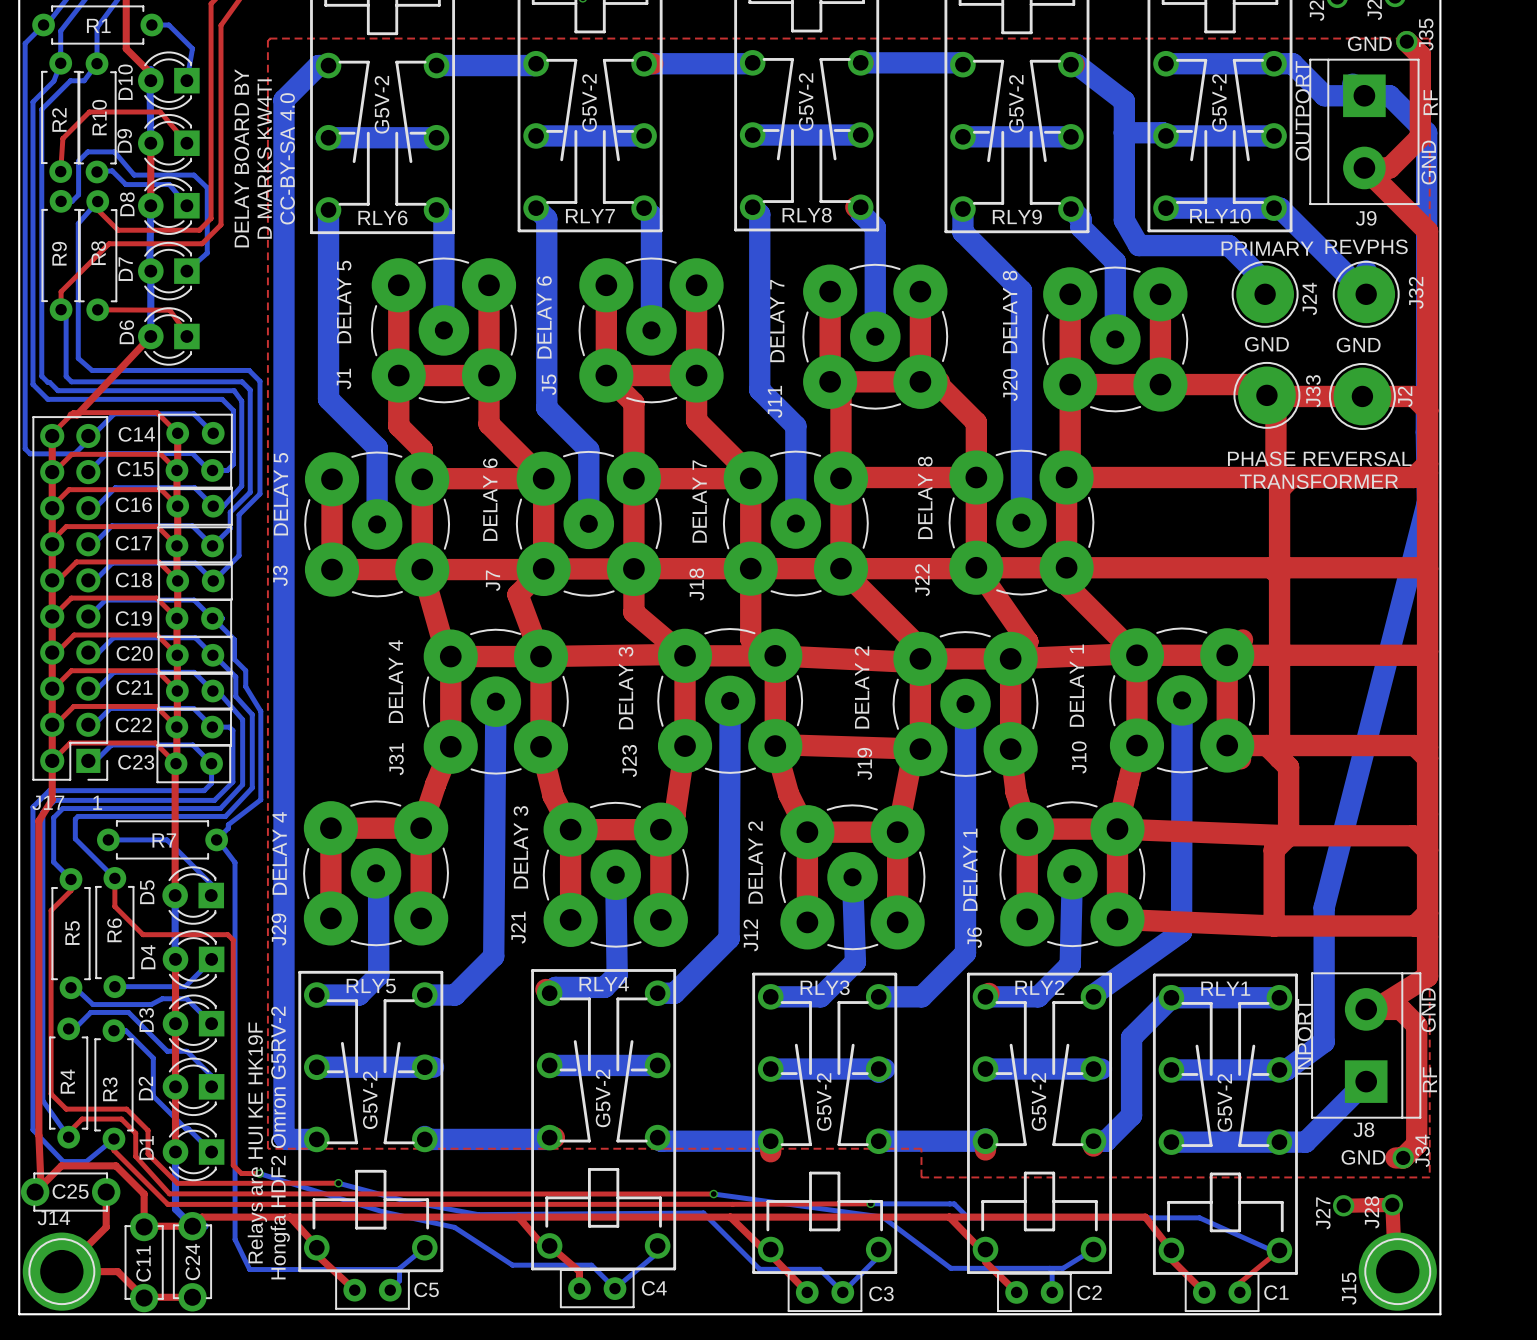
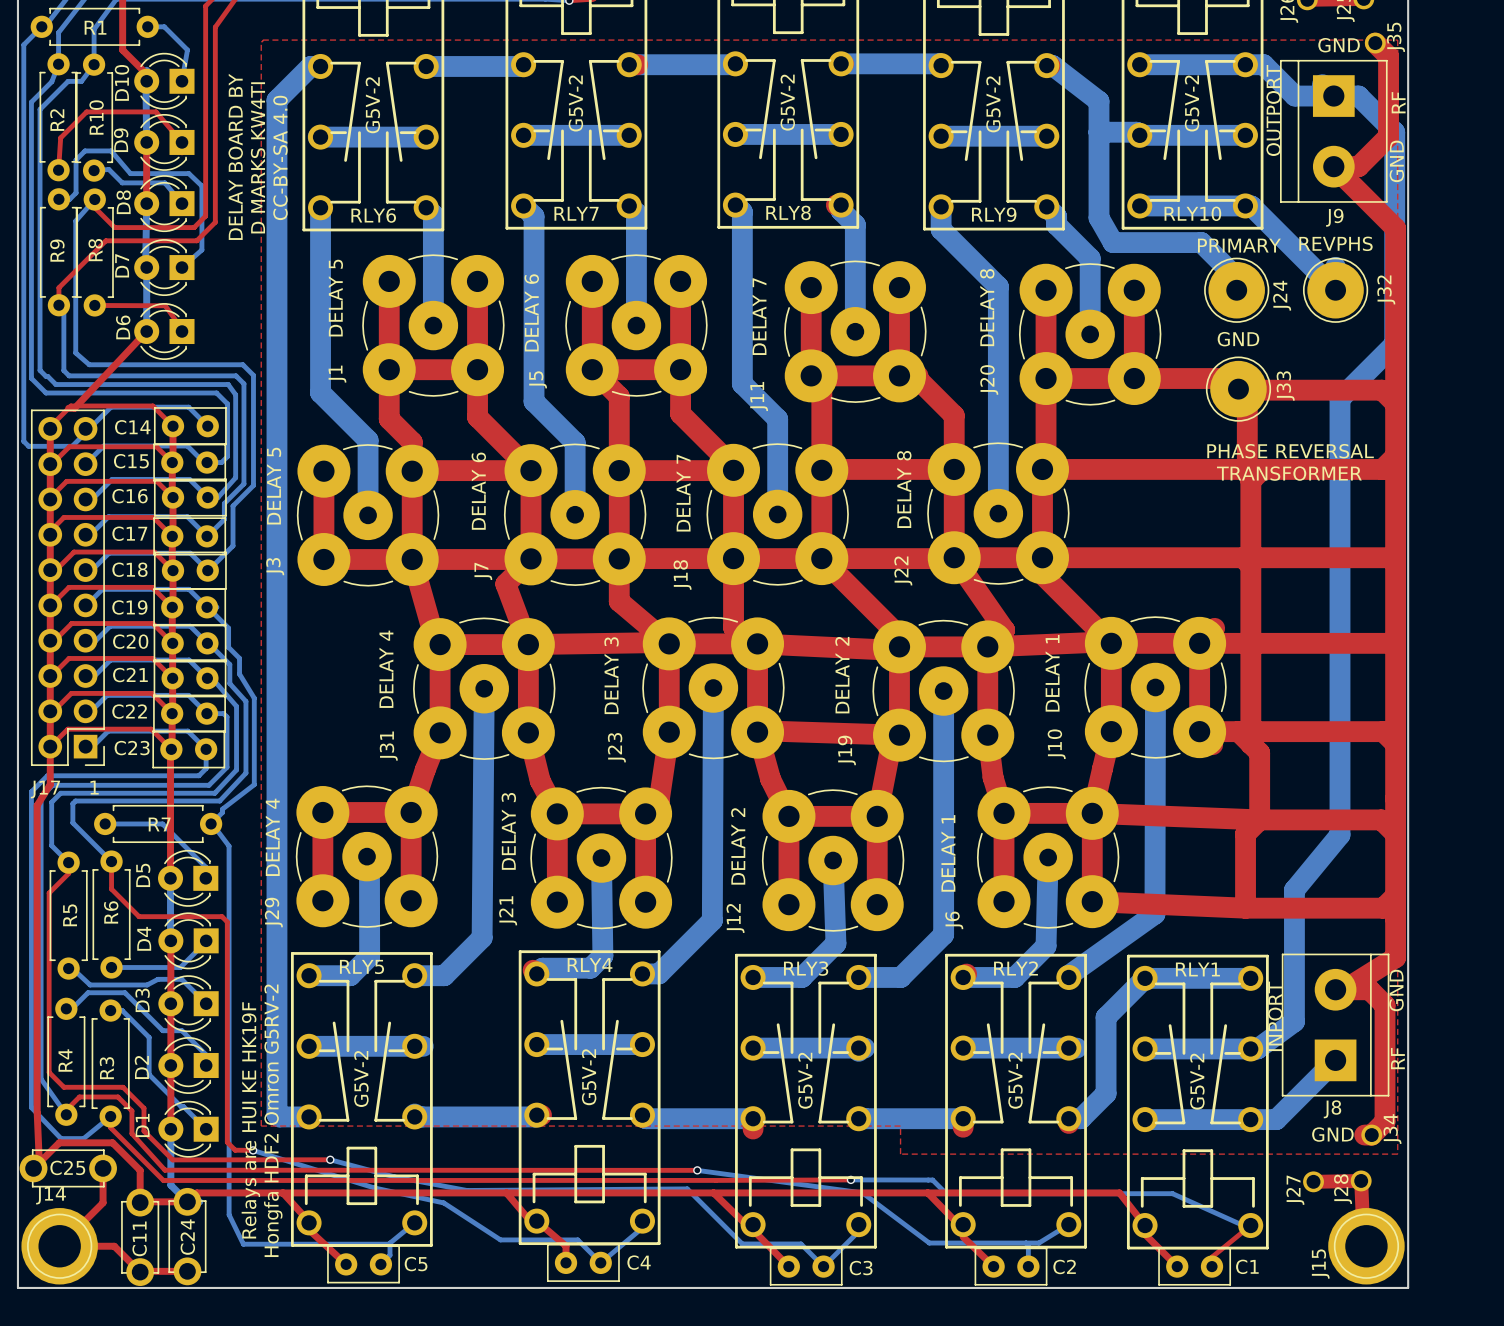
text: GND (1358, 345) -> none
bottom track: (1426, 349) (1427, 502) (1324, 907) -> (1394, 344) (1339, 398) (1339, 834) (1294, 890)
J2: (1362, 396) -> none

